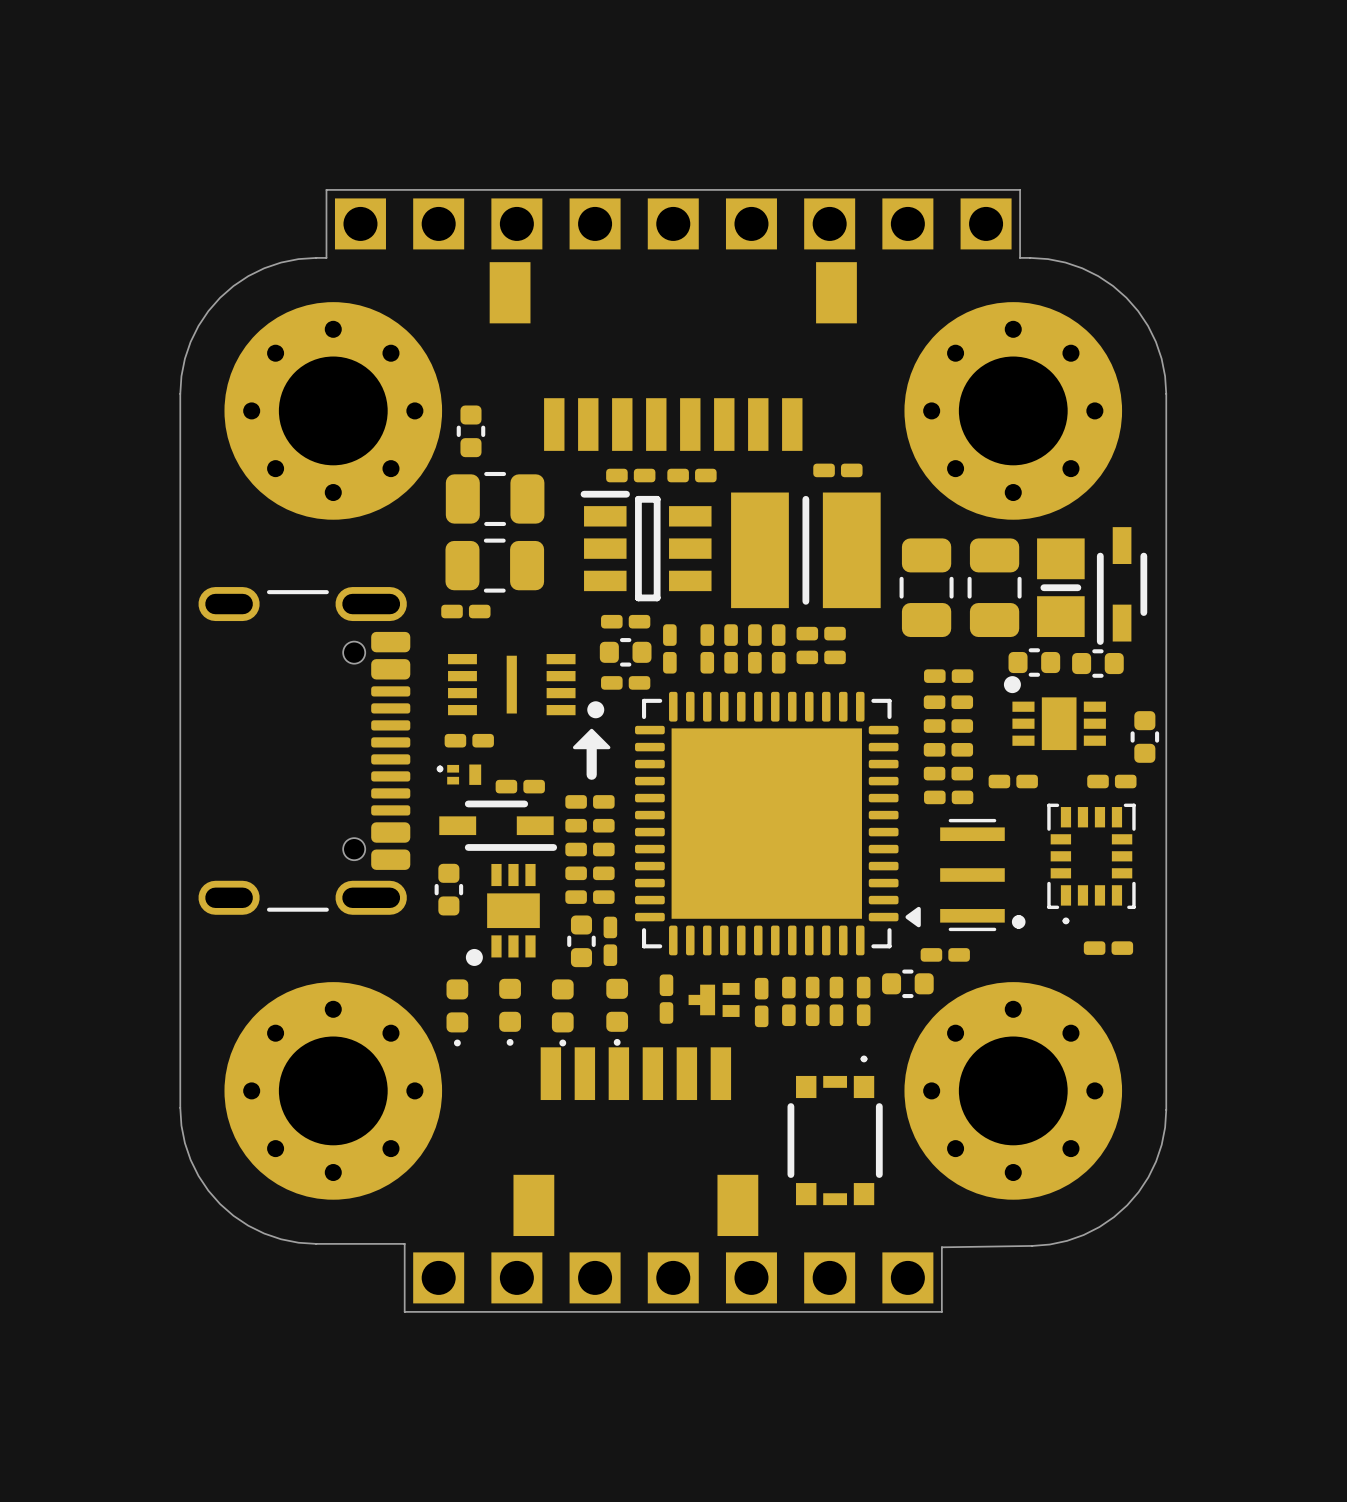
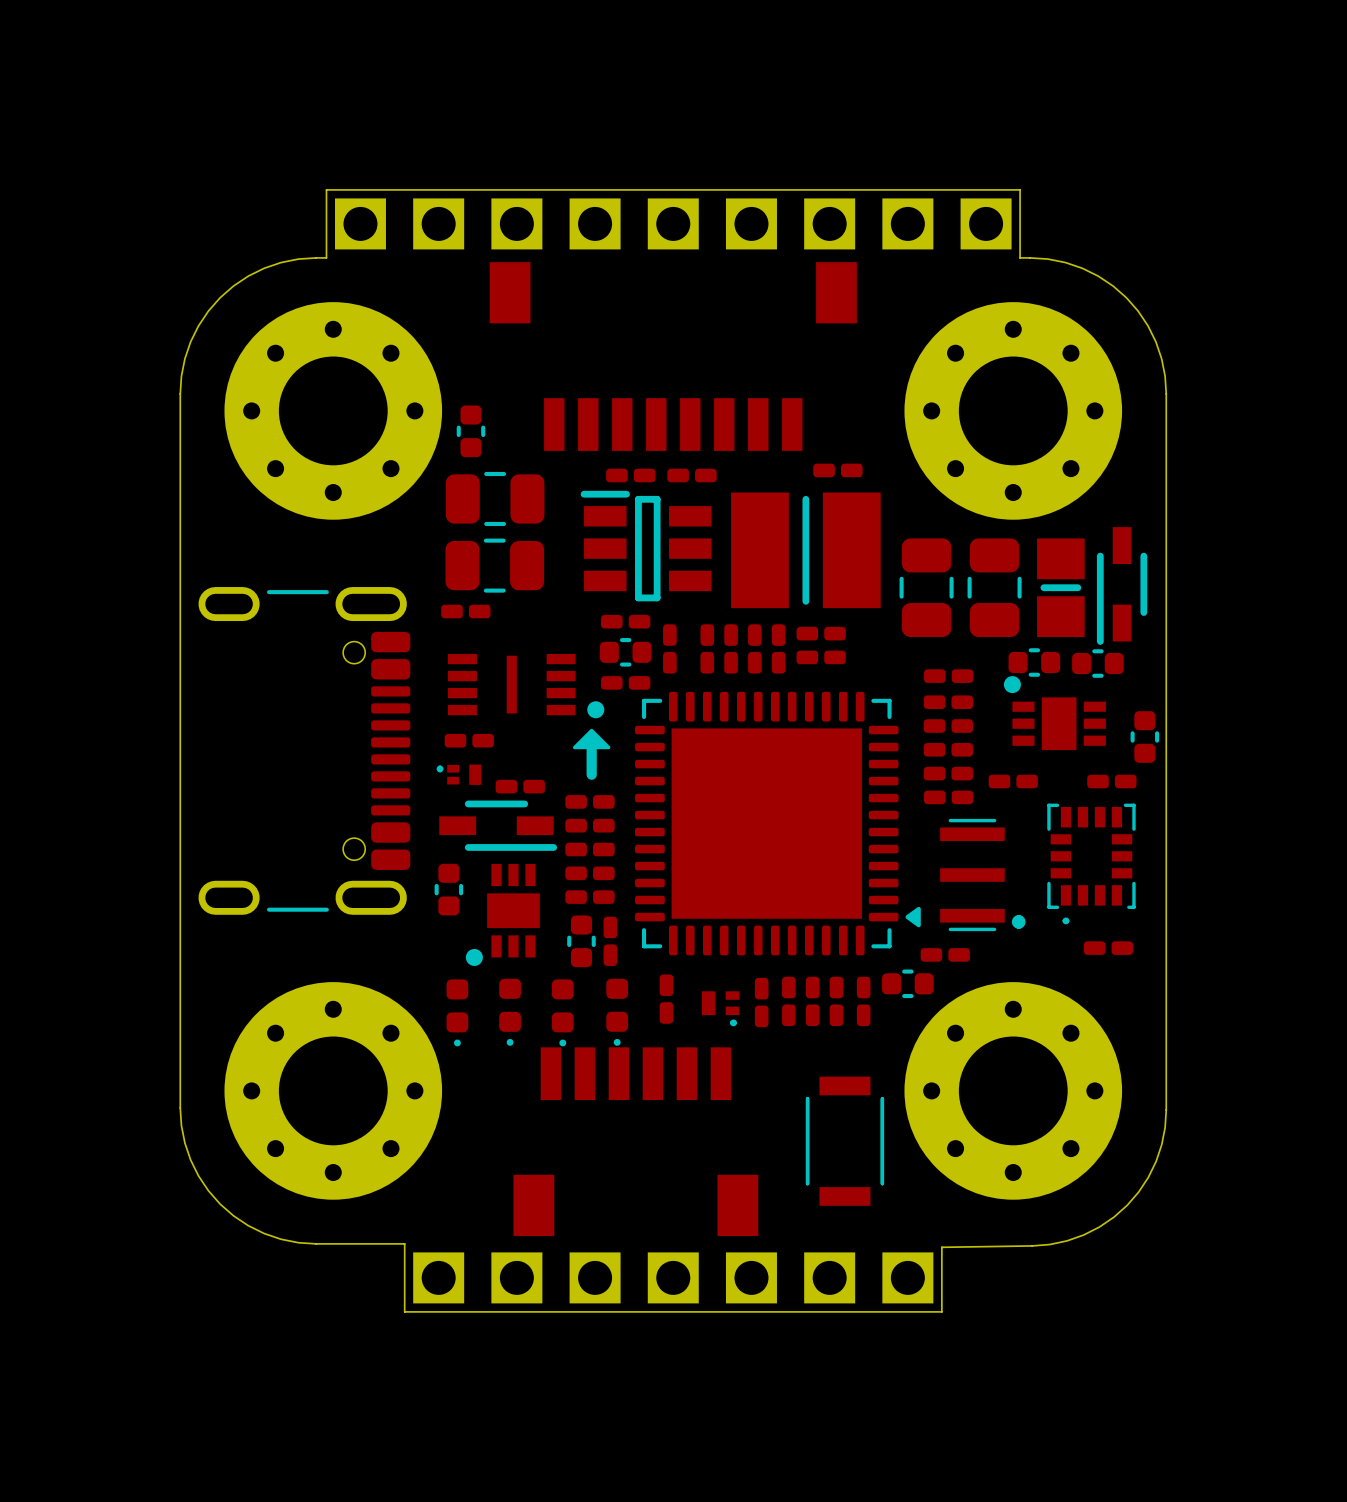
part footprint: [688, 982, 740, 1017] -> [701, 991, 740, 1027]
part footprint: [787, 1055, 883, 1206] -> [805, 1076, 885, 1206]

